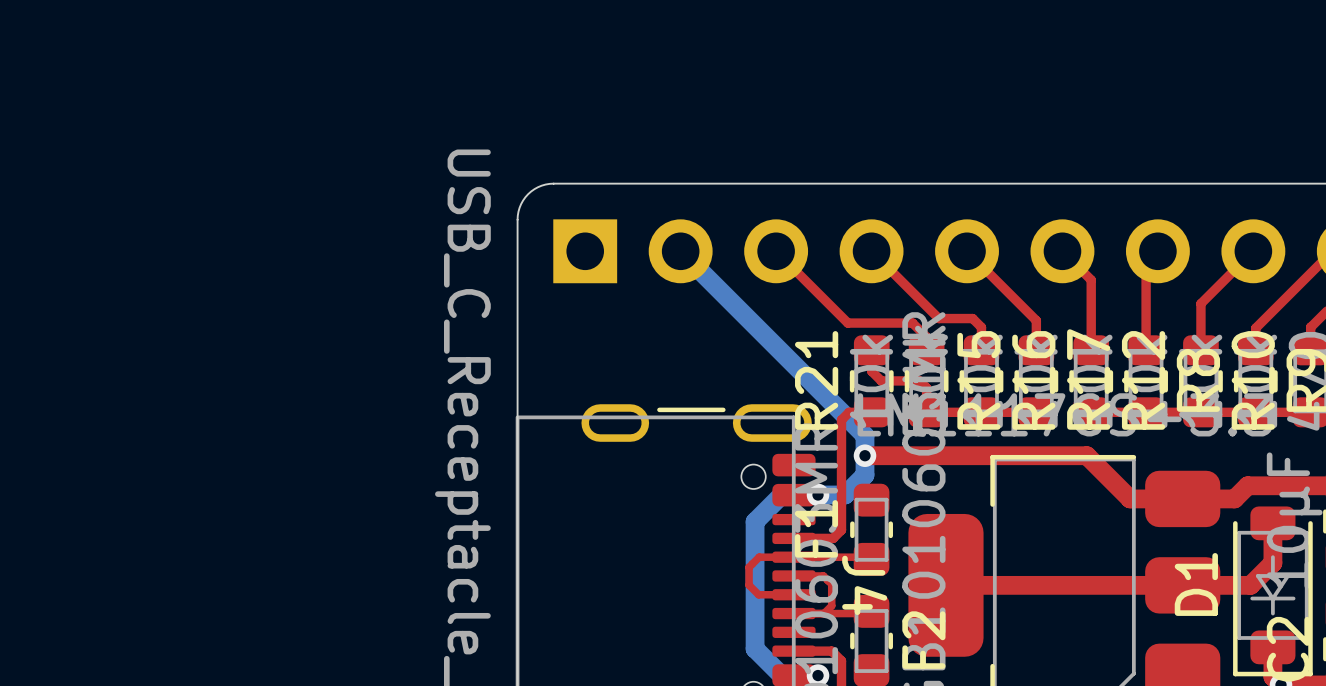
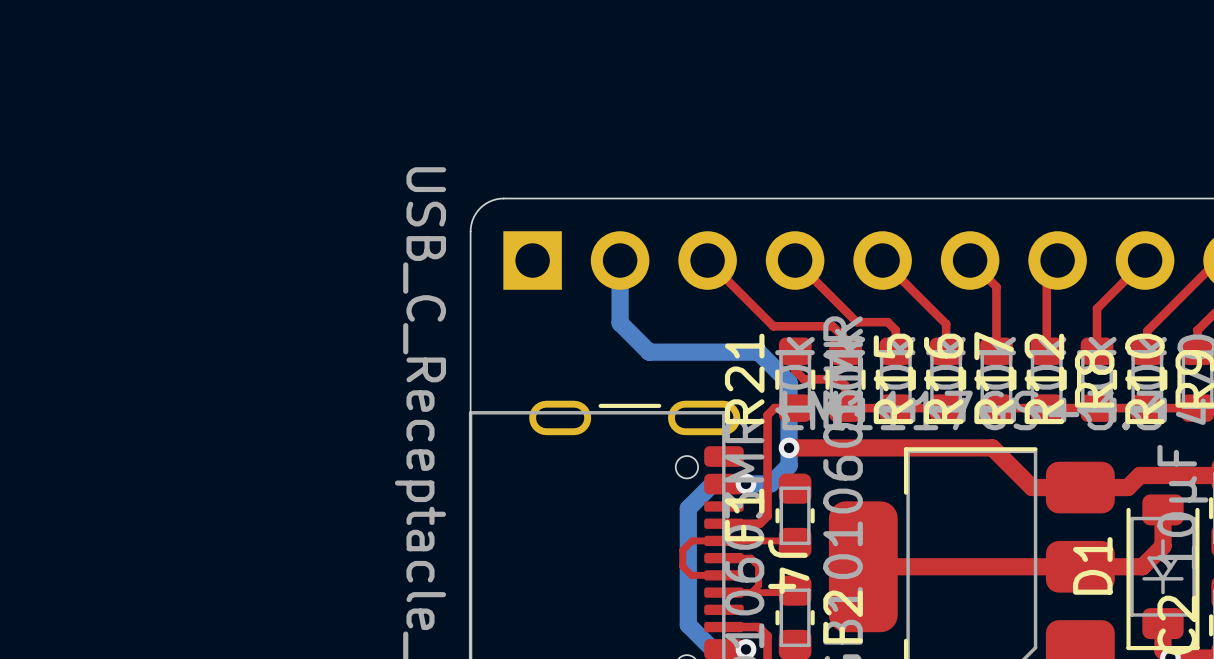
bottom track: (680, 251) (864, 435) -> (620, 260) (620, 323) (649, 352) (758, 352) (789, 382) (789, 429)

